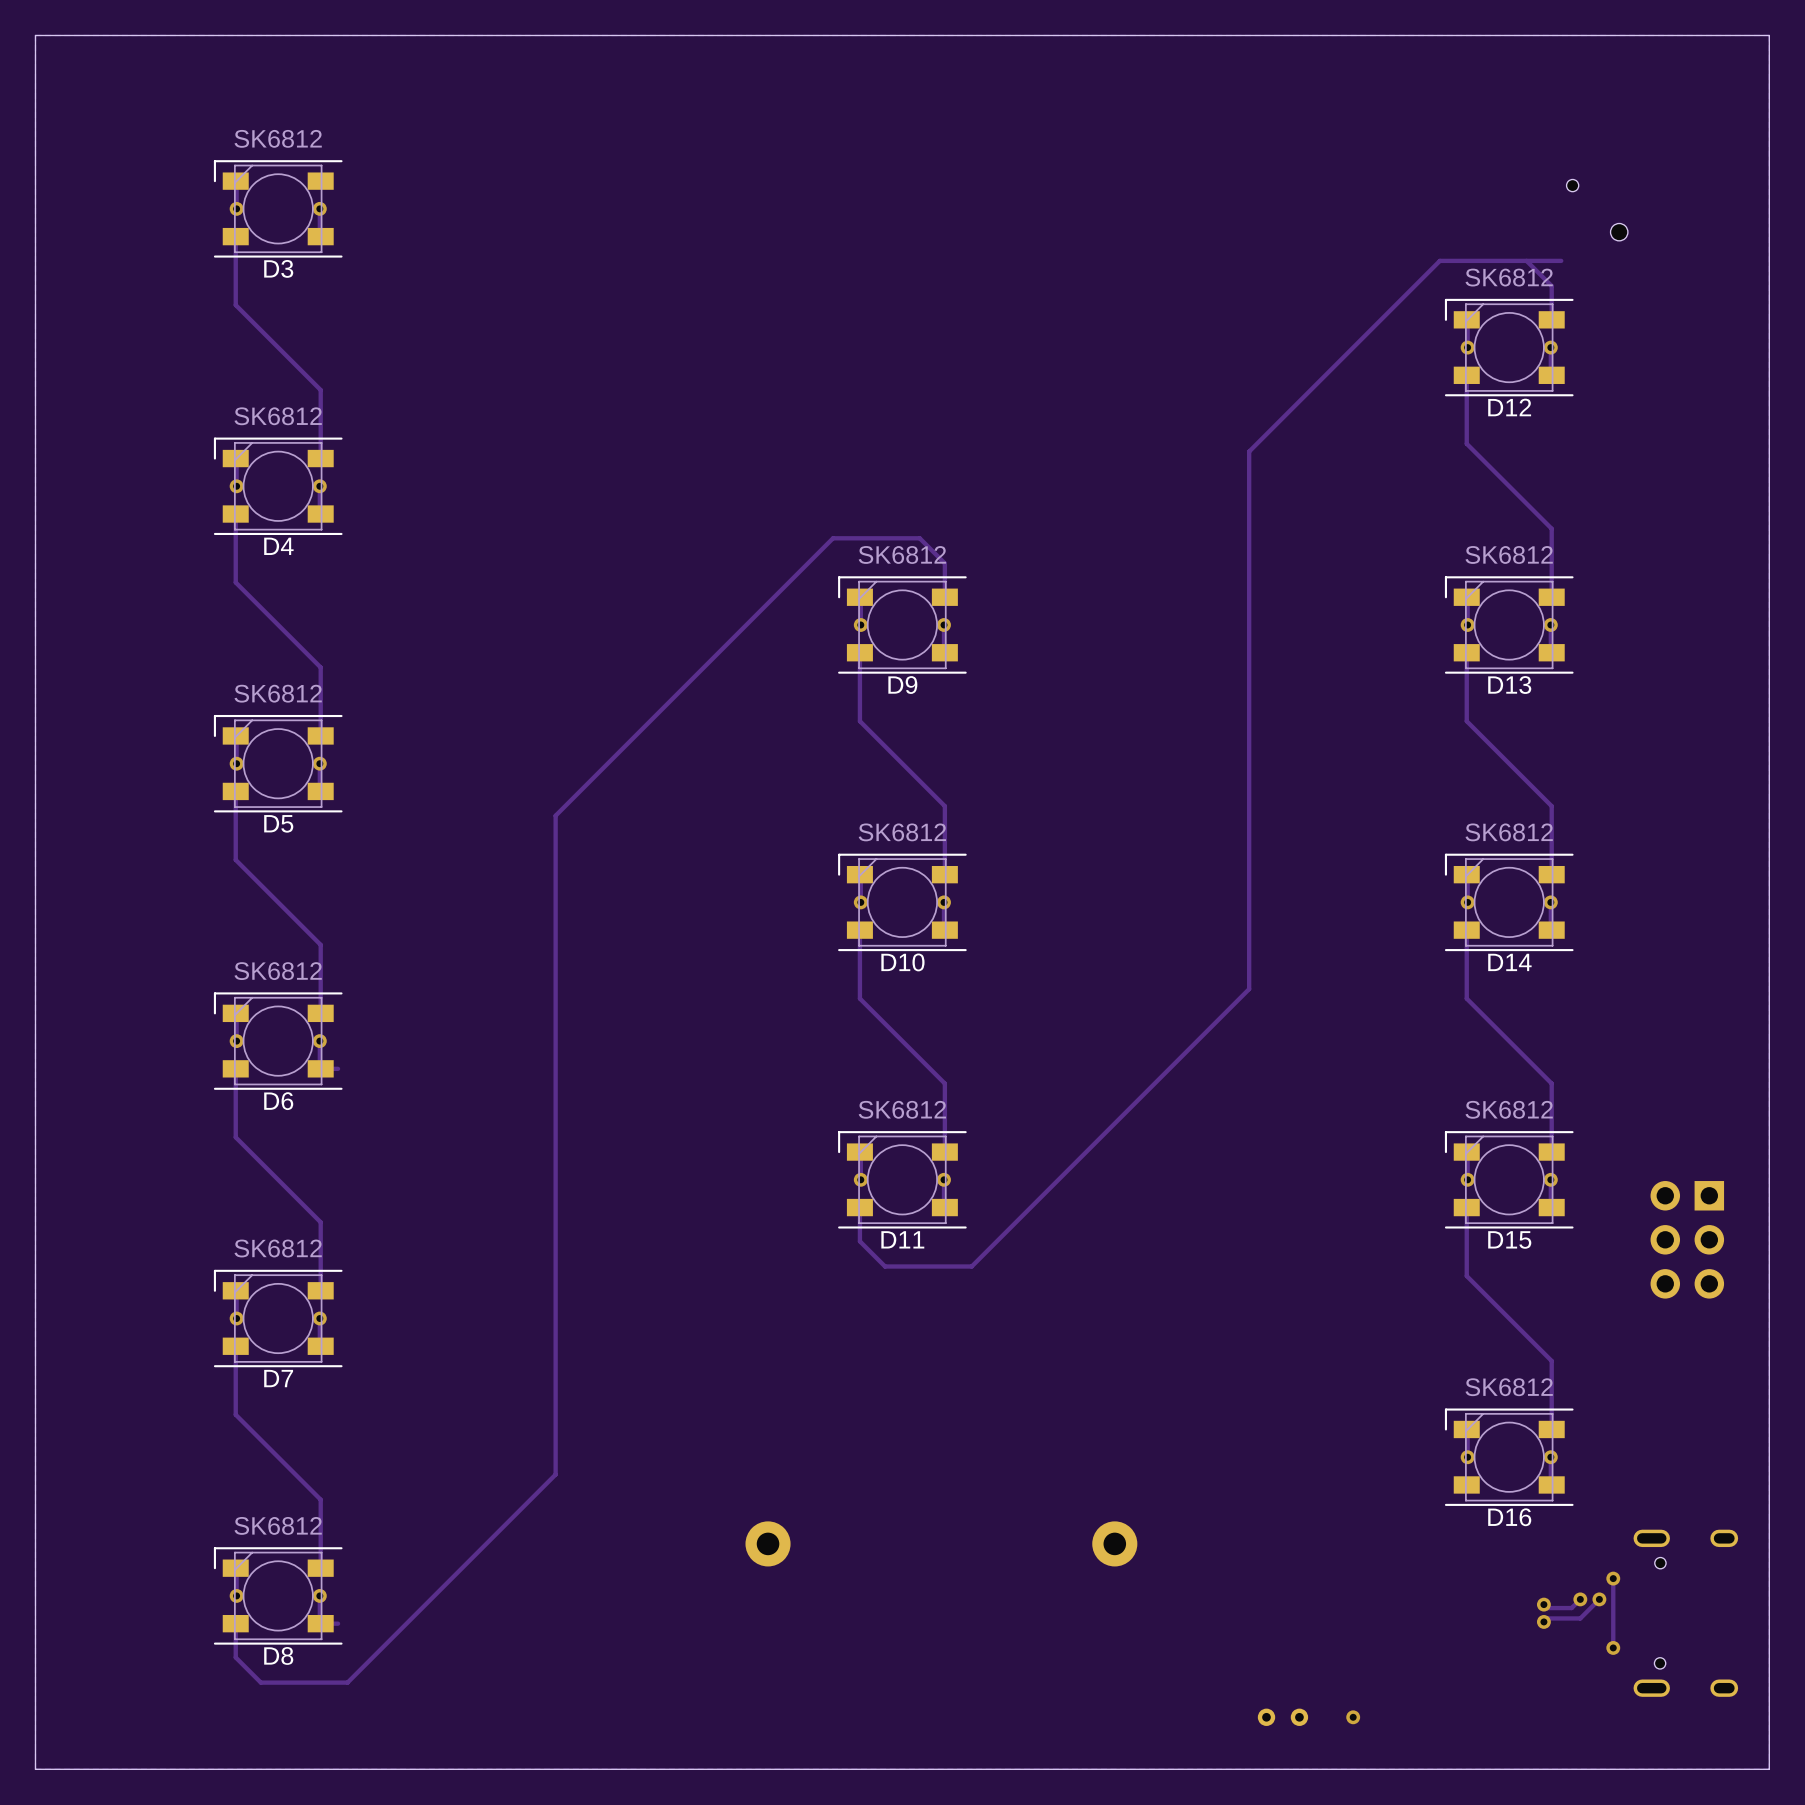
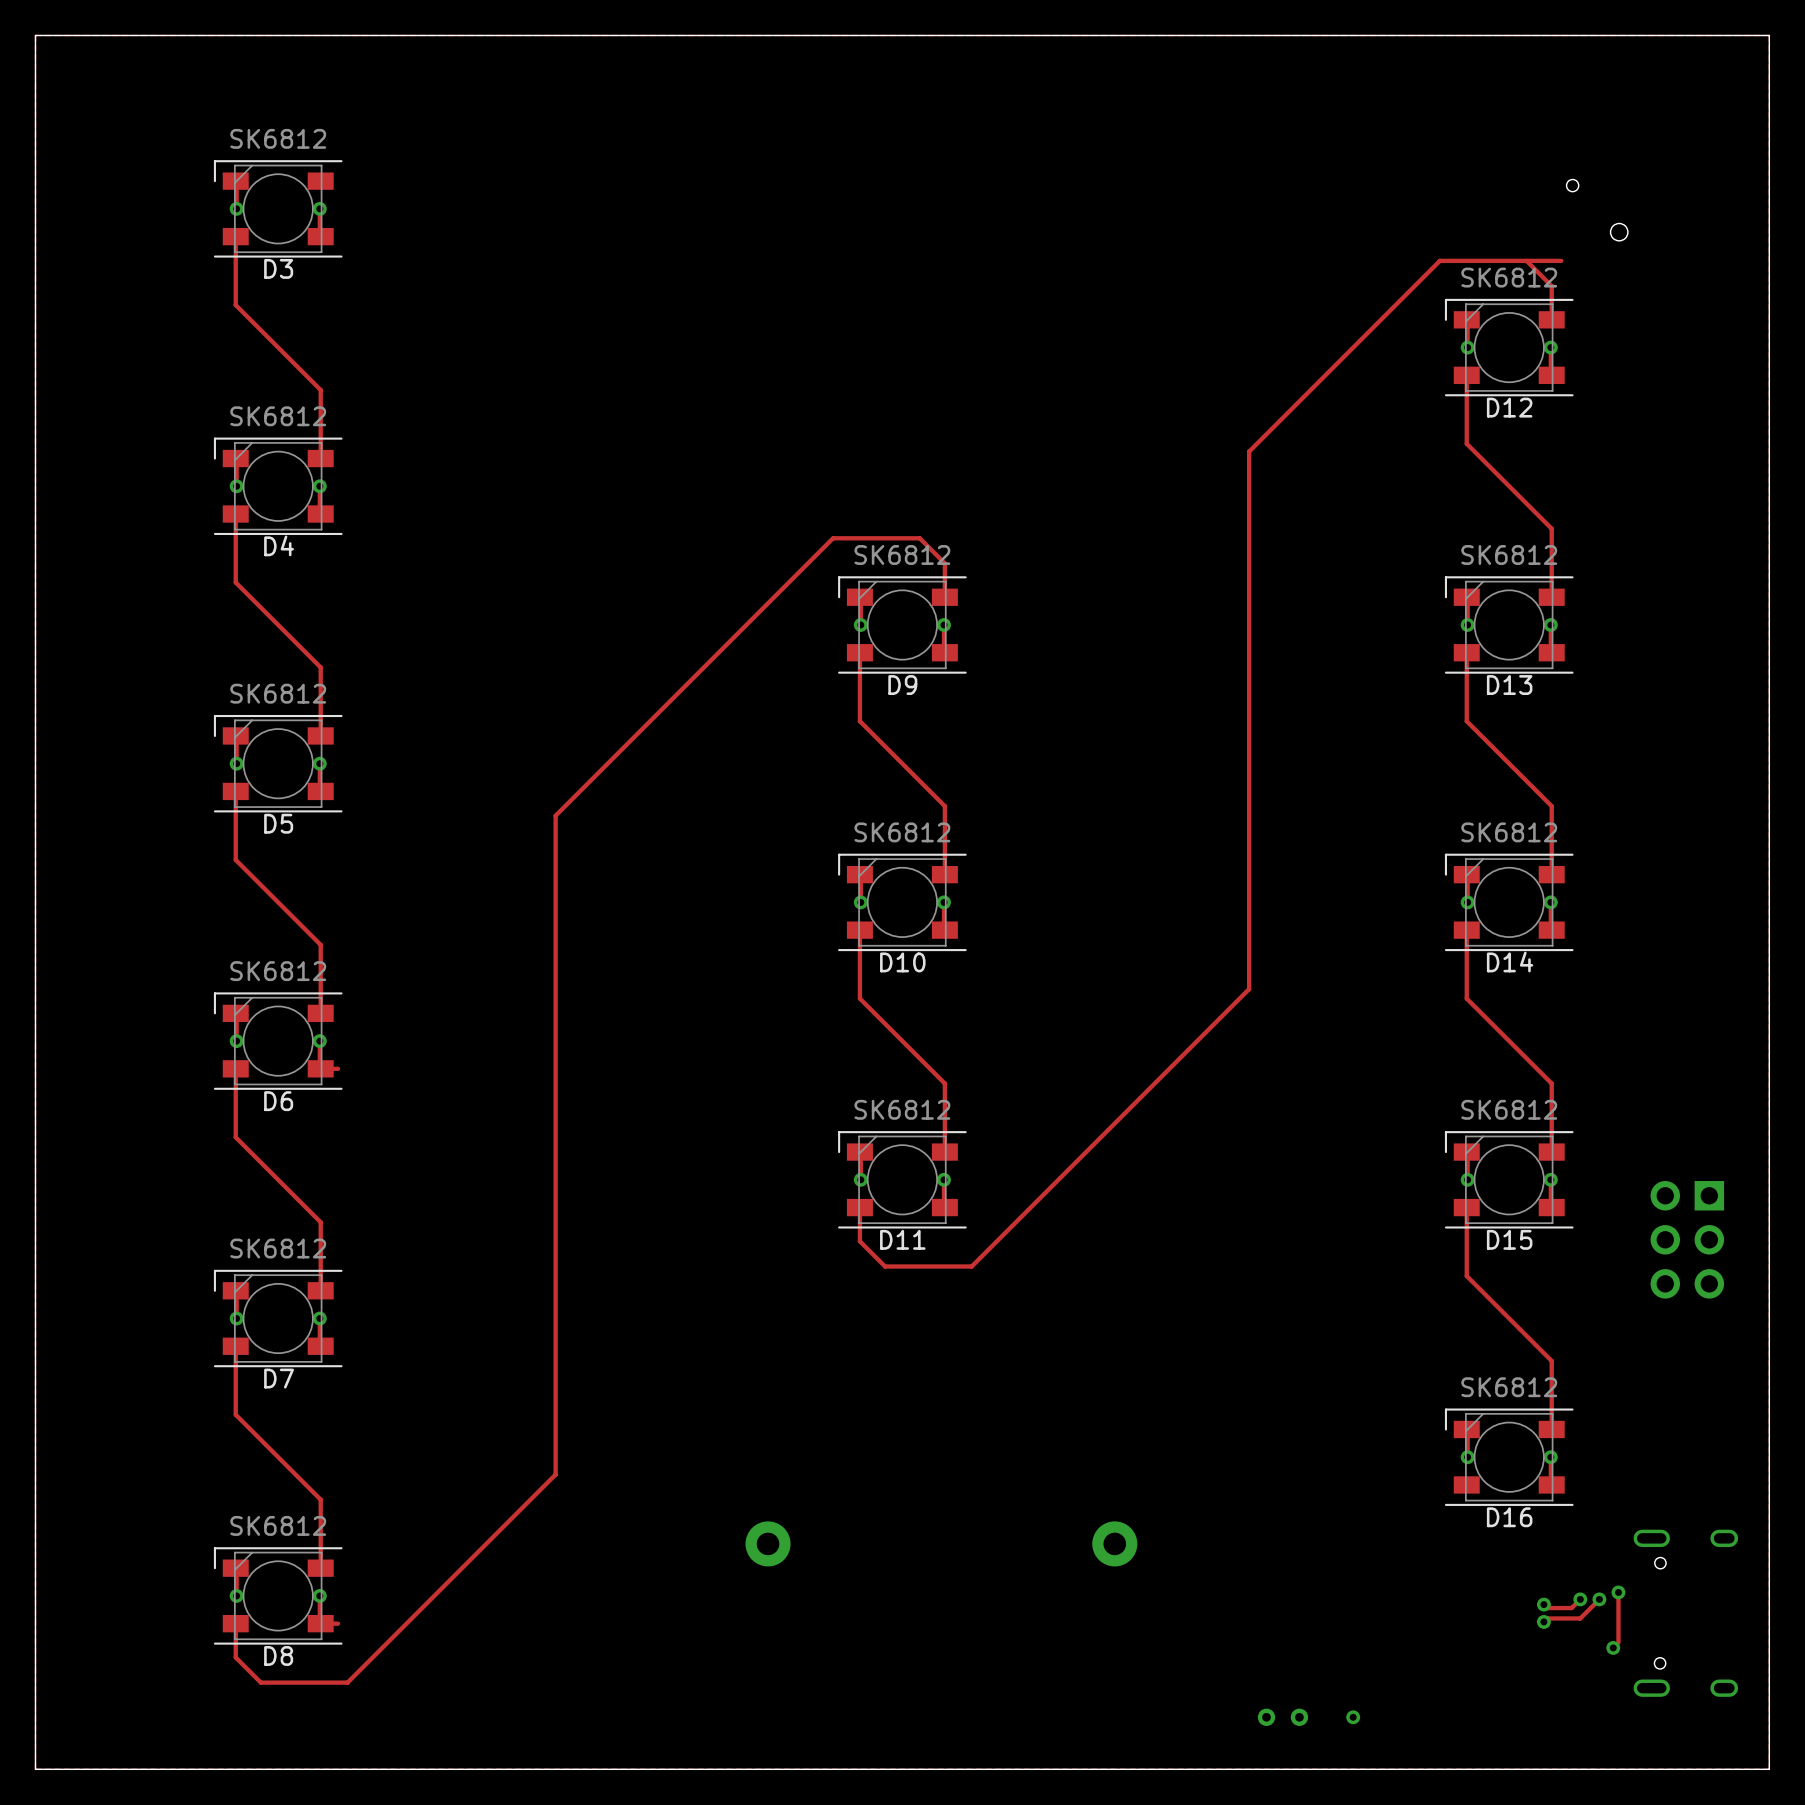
track: (1613, 1578) (1613, 1647) -> none
via position: (1613, 1578) -> (1618, 1592)
track: none -> (1618, 1592) (1618, 1642)

